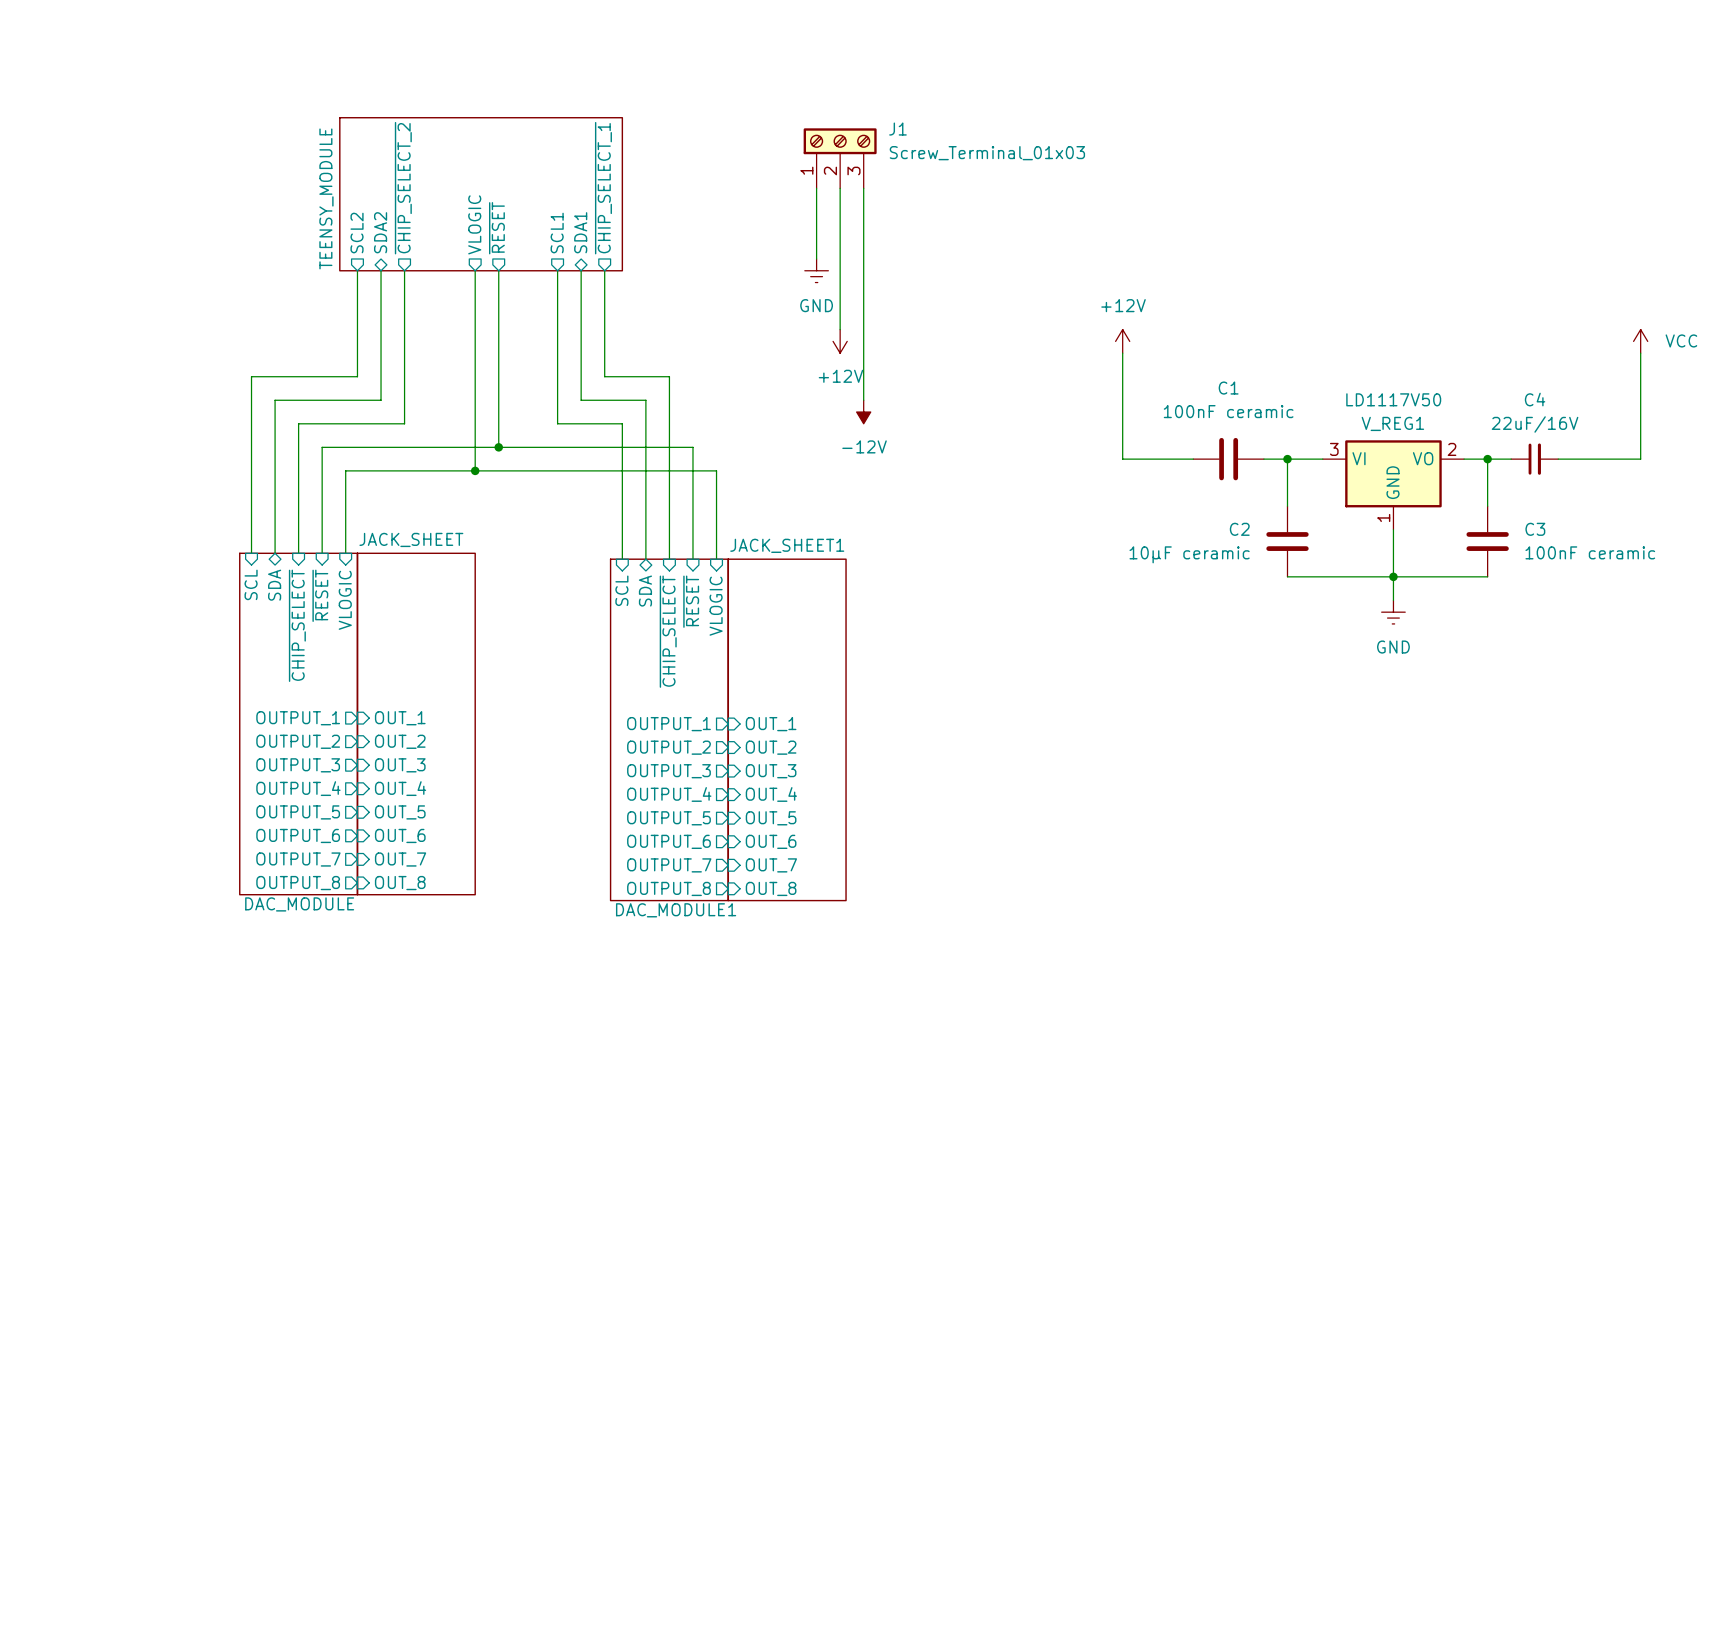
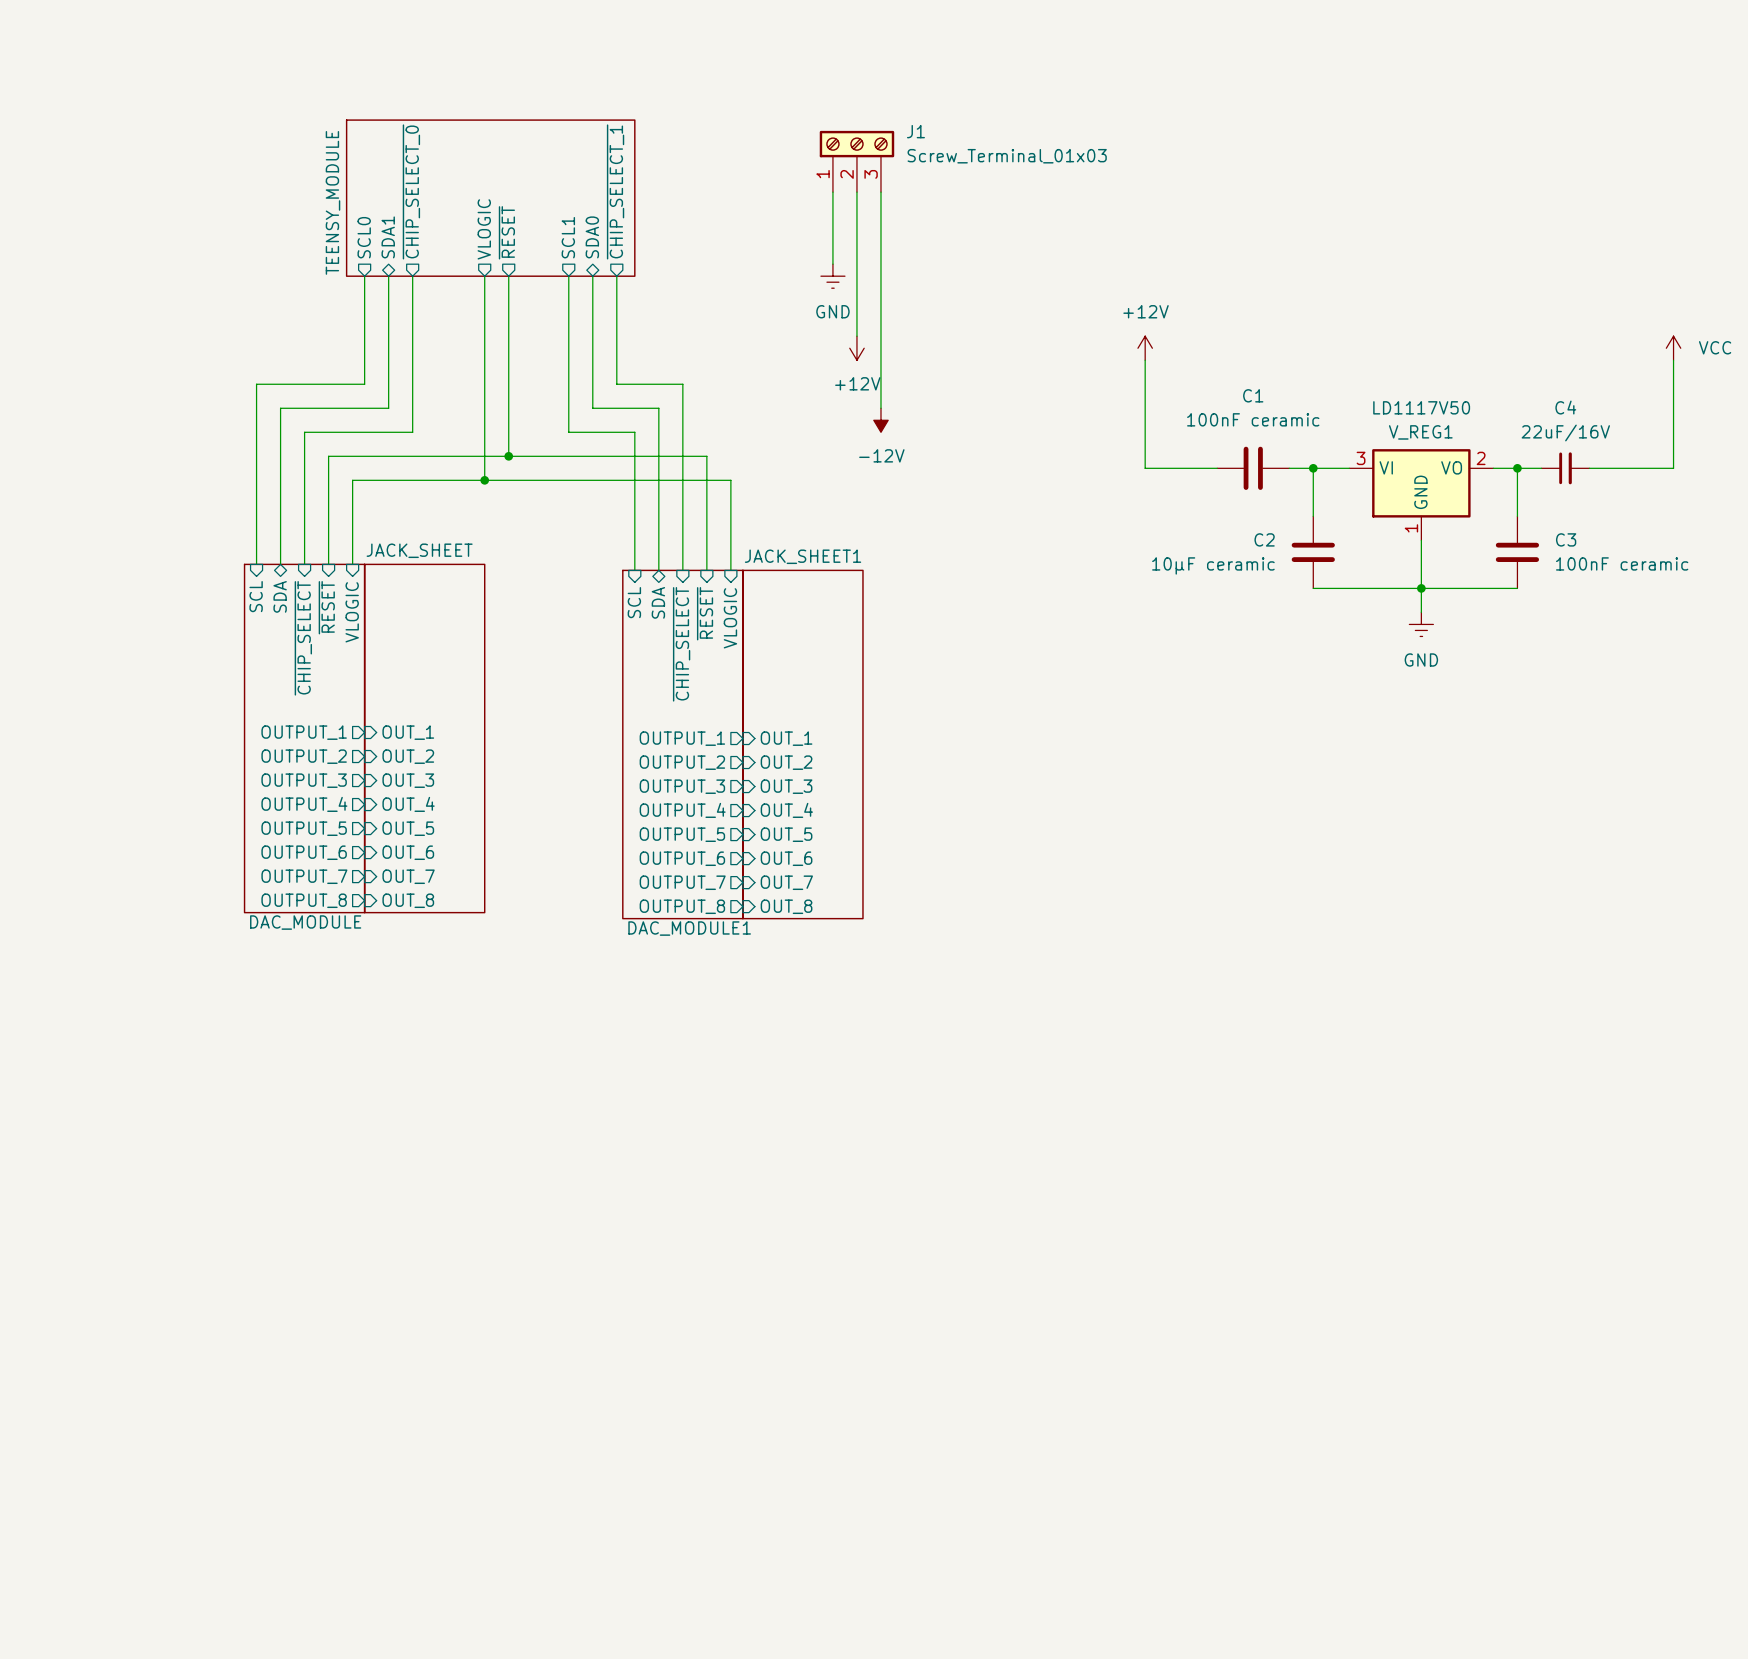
sheet pin: ~{CHIP_SELECT_2} (403, 188) -> ~{CHIP_SELECT_0} (411, 191)
sheet pin: SDA2 (380, 232) -> SDA1 (388, 237)
sheet pin: SDA1 (580, 232) -> SDA0 (592, 237)
sheet pin: SCL2 (357, 233) -> SCL0 (364, 237)

